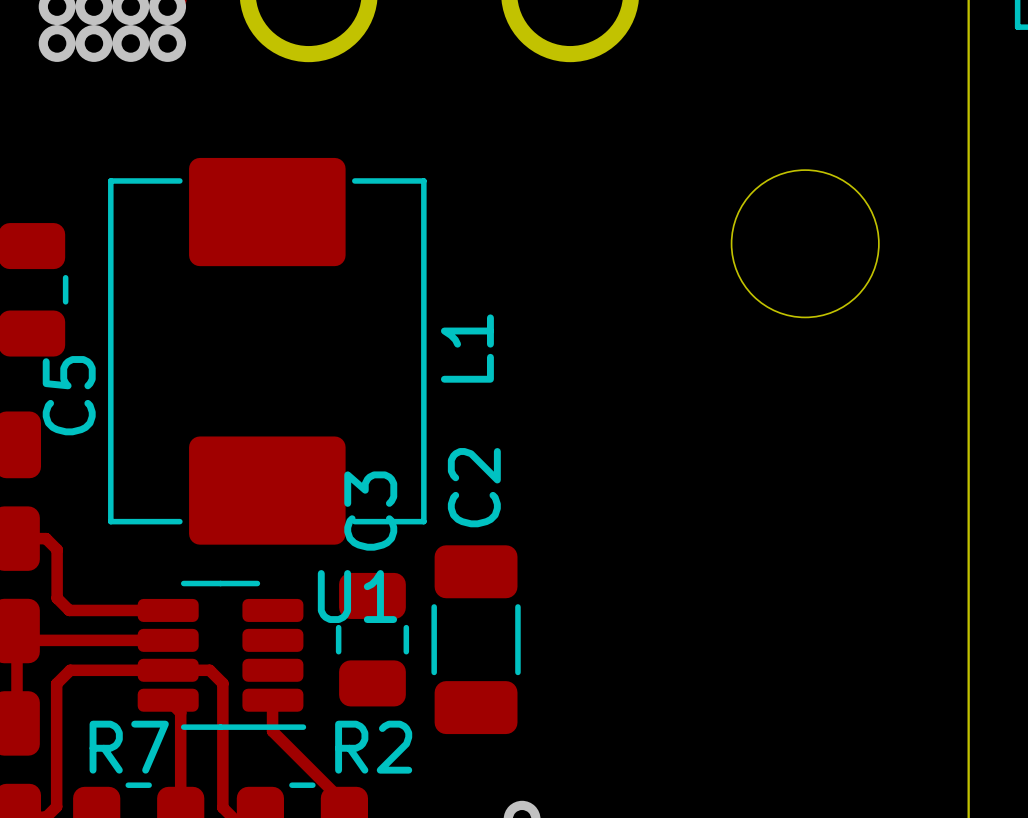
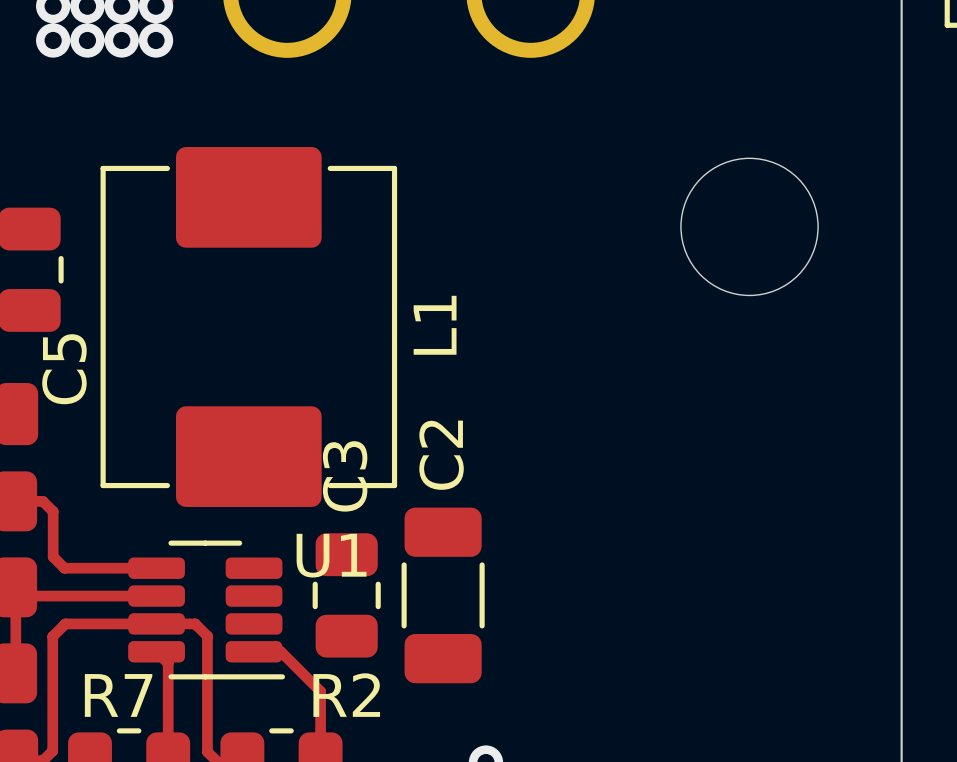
track: (272, 700) (272, 731) (344, 803) -> (254, 651) (280, 651) (320, 691) (320, 747)

